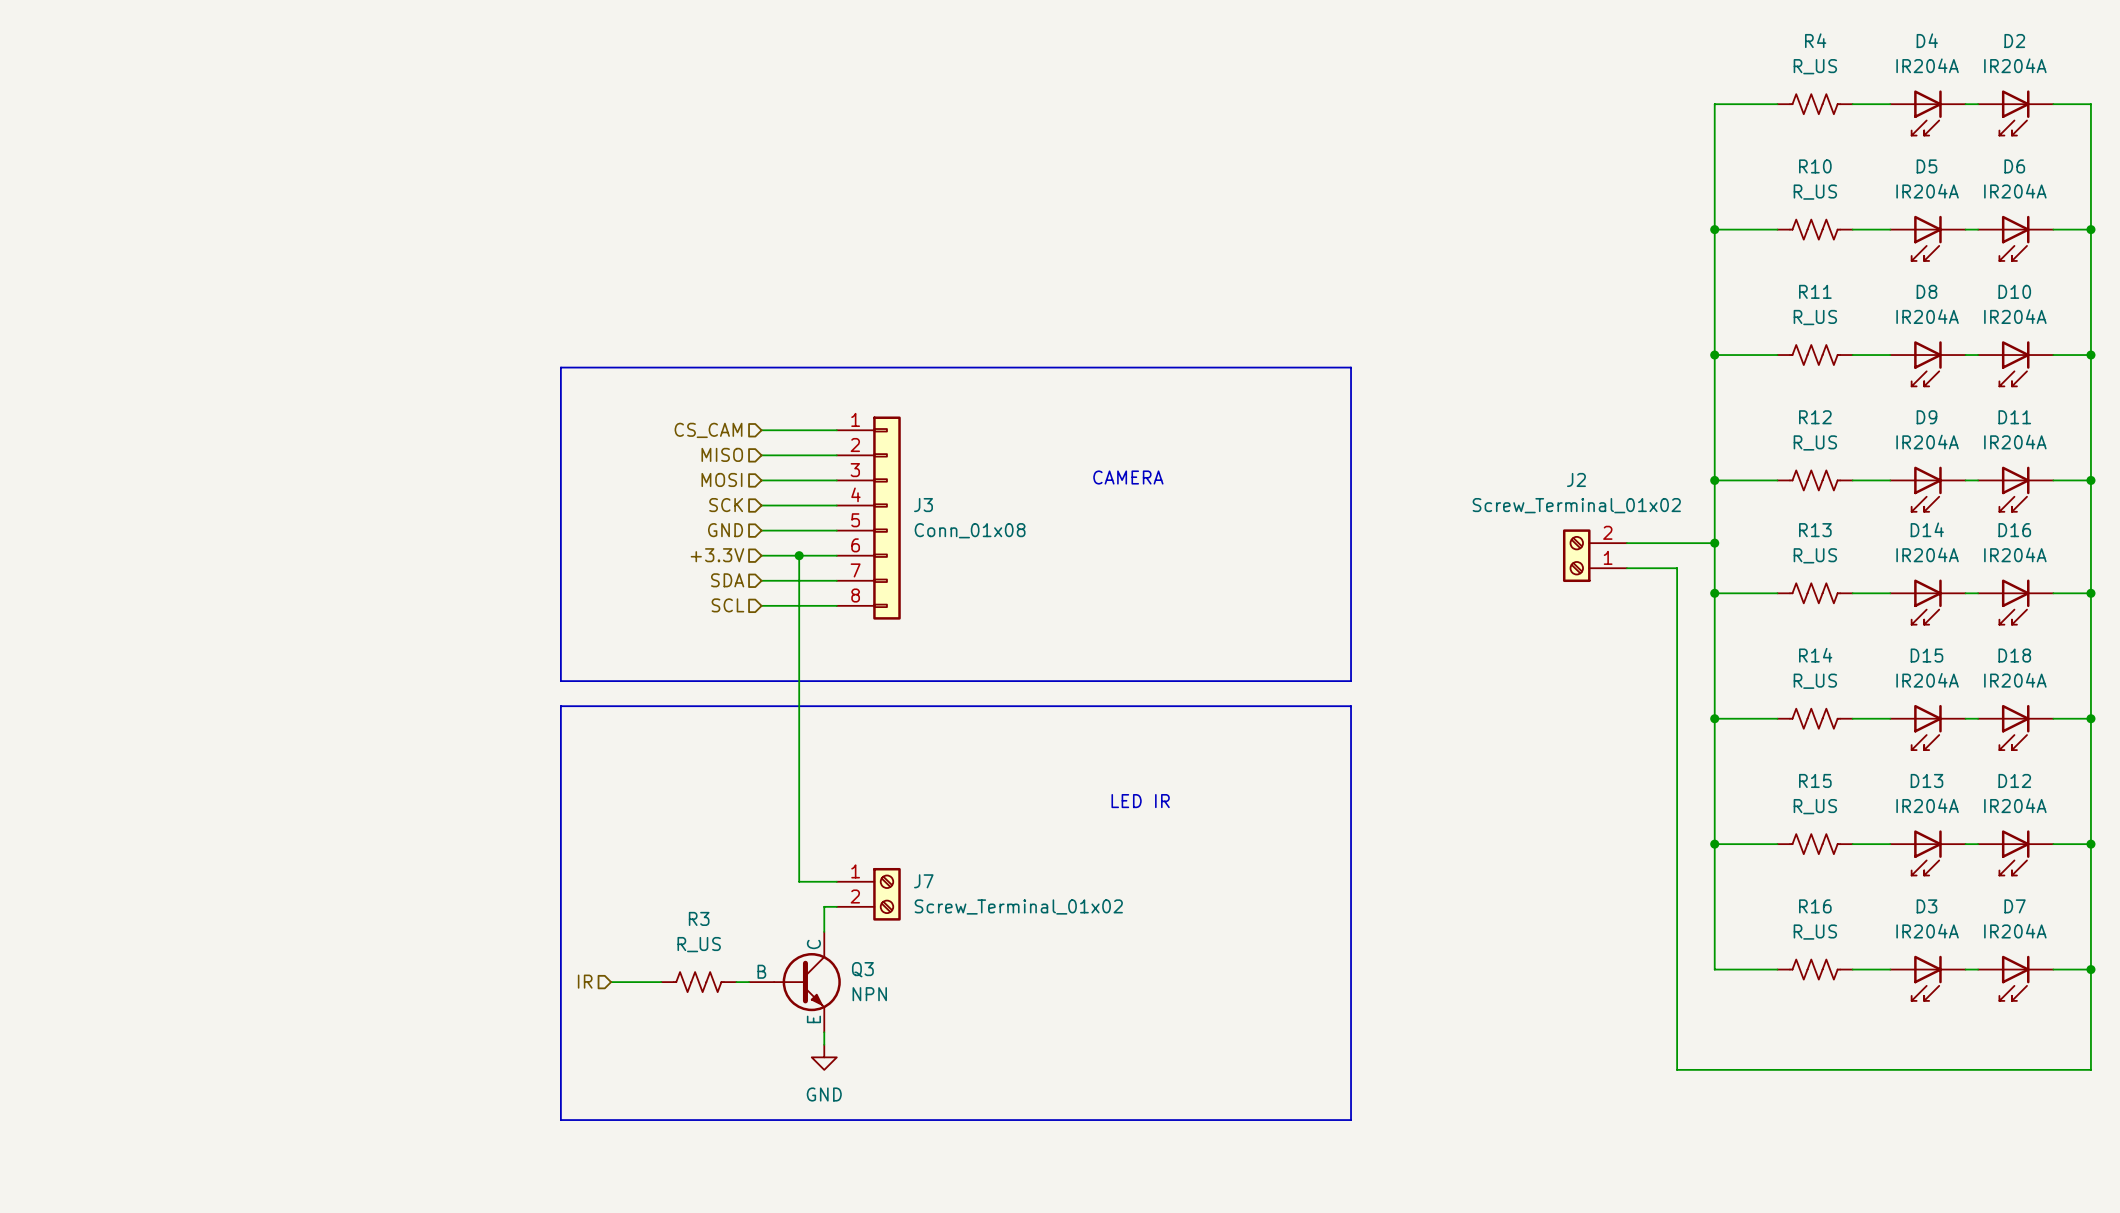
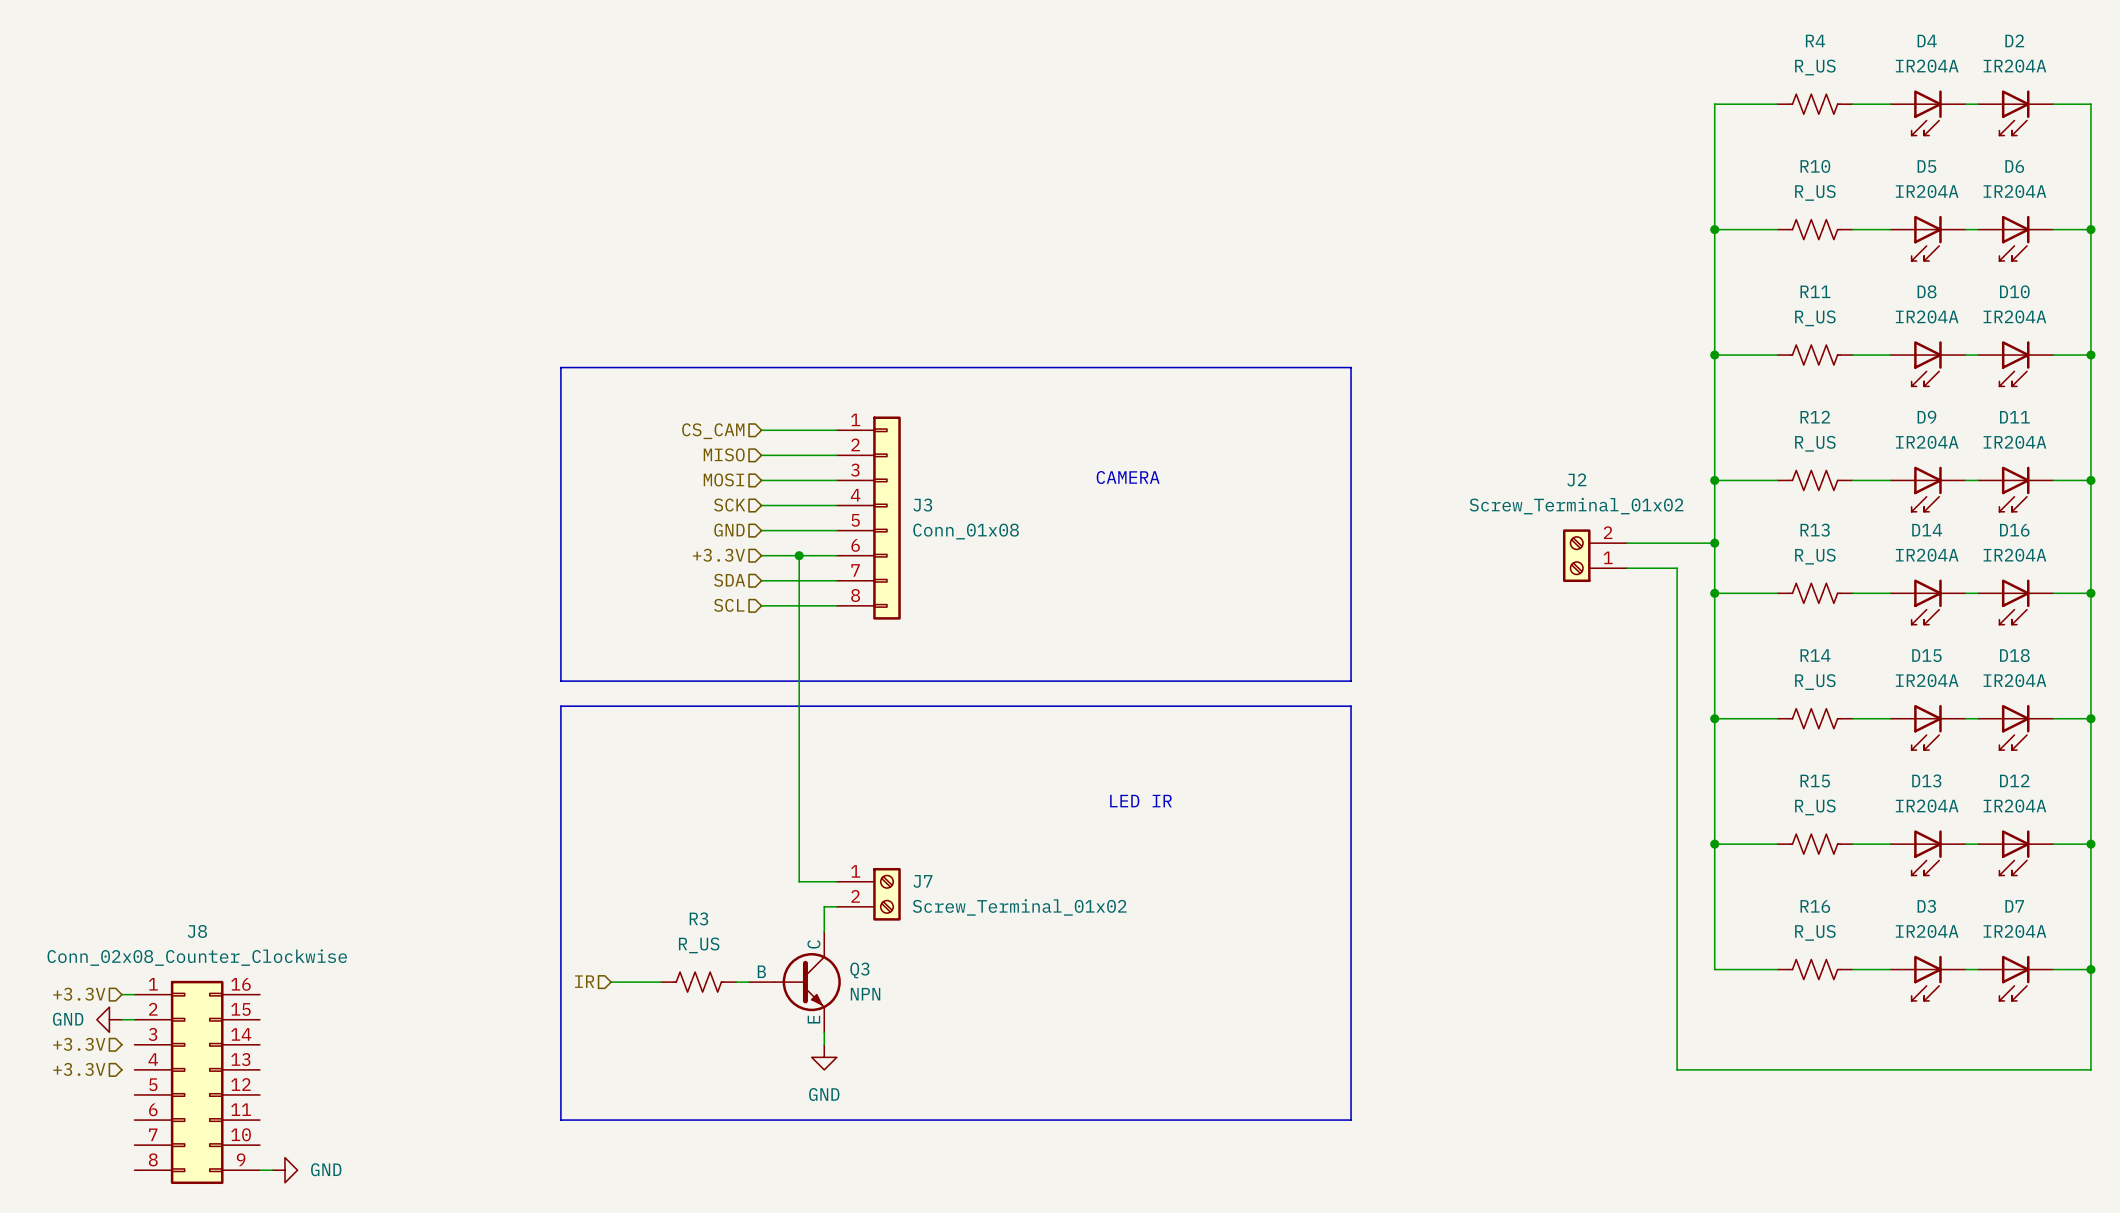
hierarchical label: none -> +3.3V (79, 994)
wire: none -> (121, 994) (134, 994)
power symbol: none -> GND (109, 1019)
wire: none -> (121, 1019) (134, 1019)
hierarchical label: none -> +3.3V (79, 1044)
hierarchical label: none -> +3.3V (79, 1069)
J8: none -> Conn_02x08_Counter_Clockwise (197, 1082)
wire: none -> (259, 1170) (272, 1170)
power symbol: none -> GND (284, 1170)

